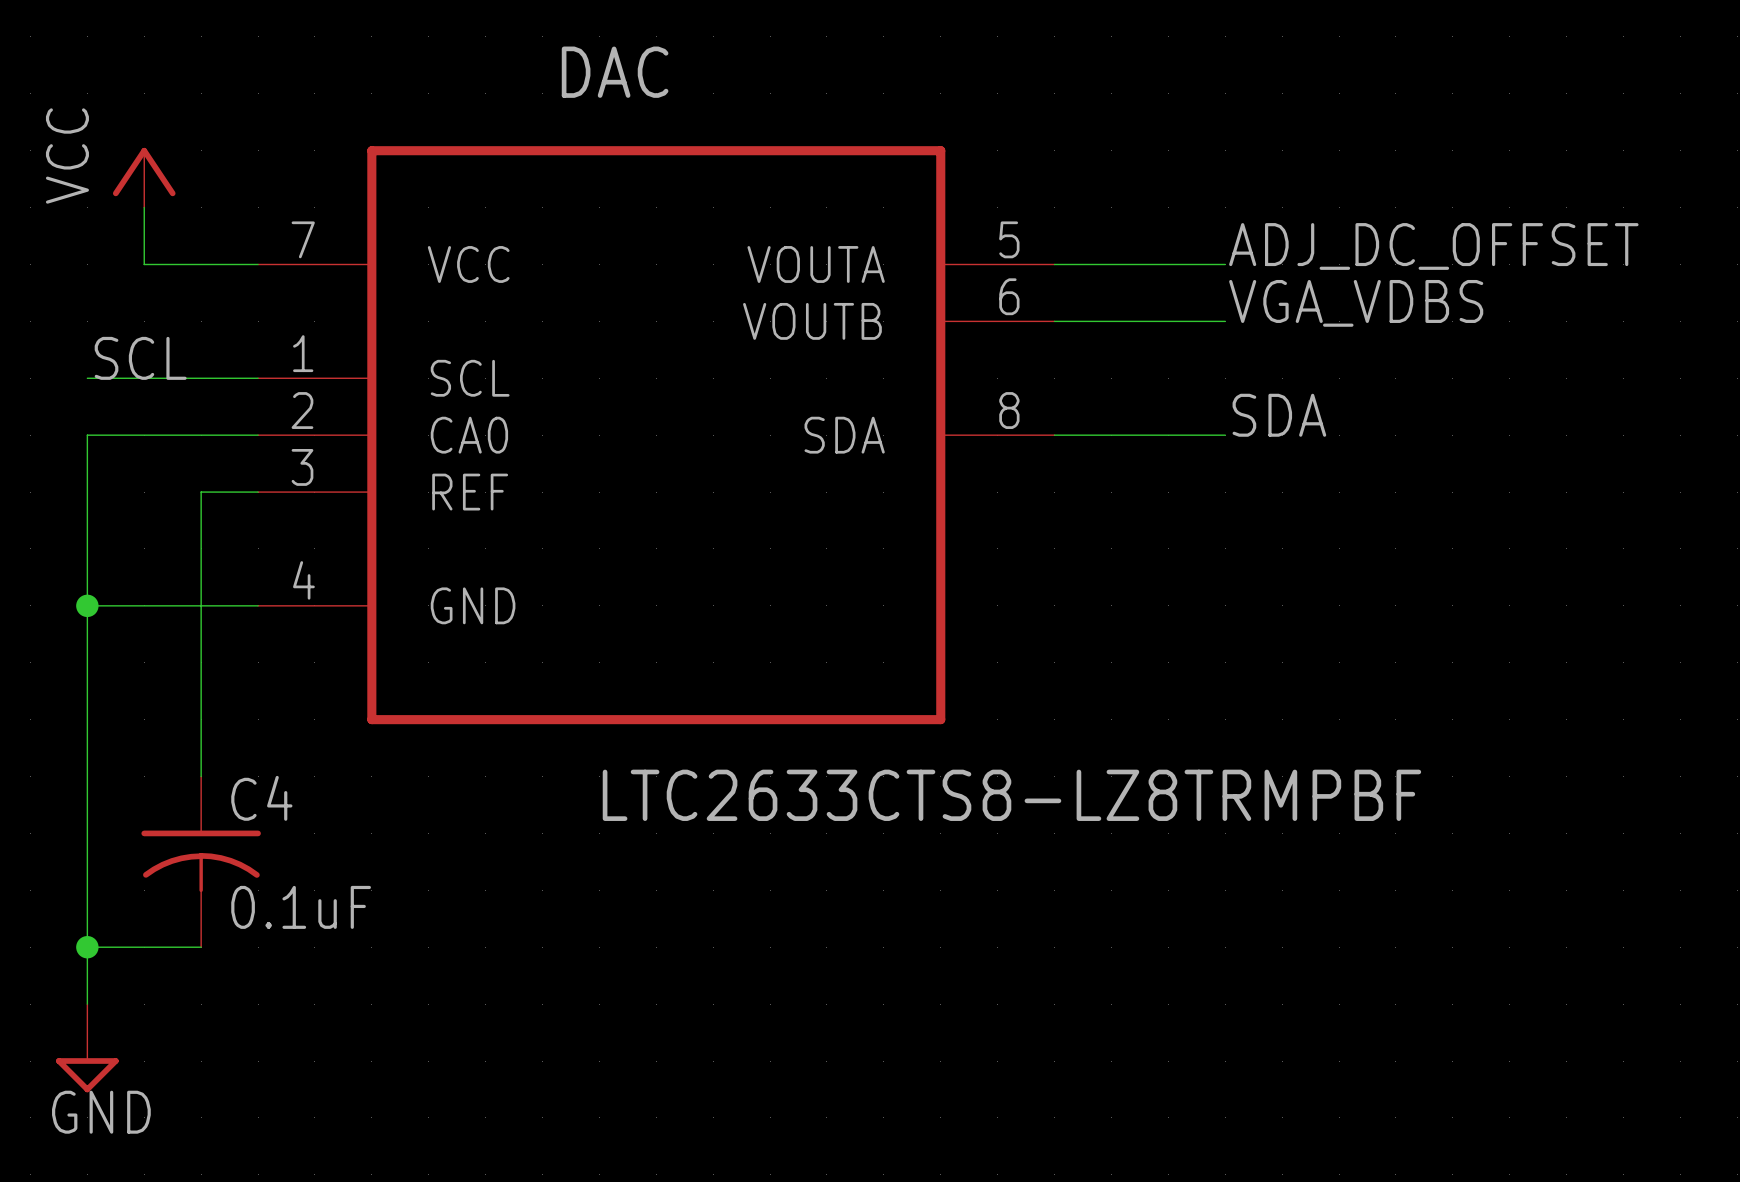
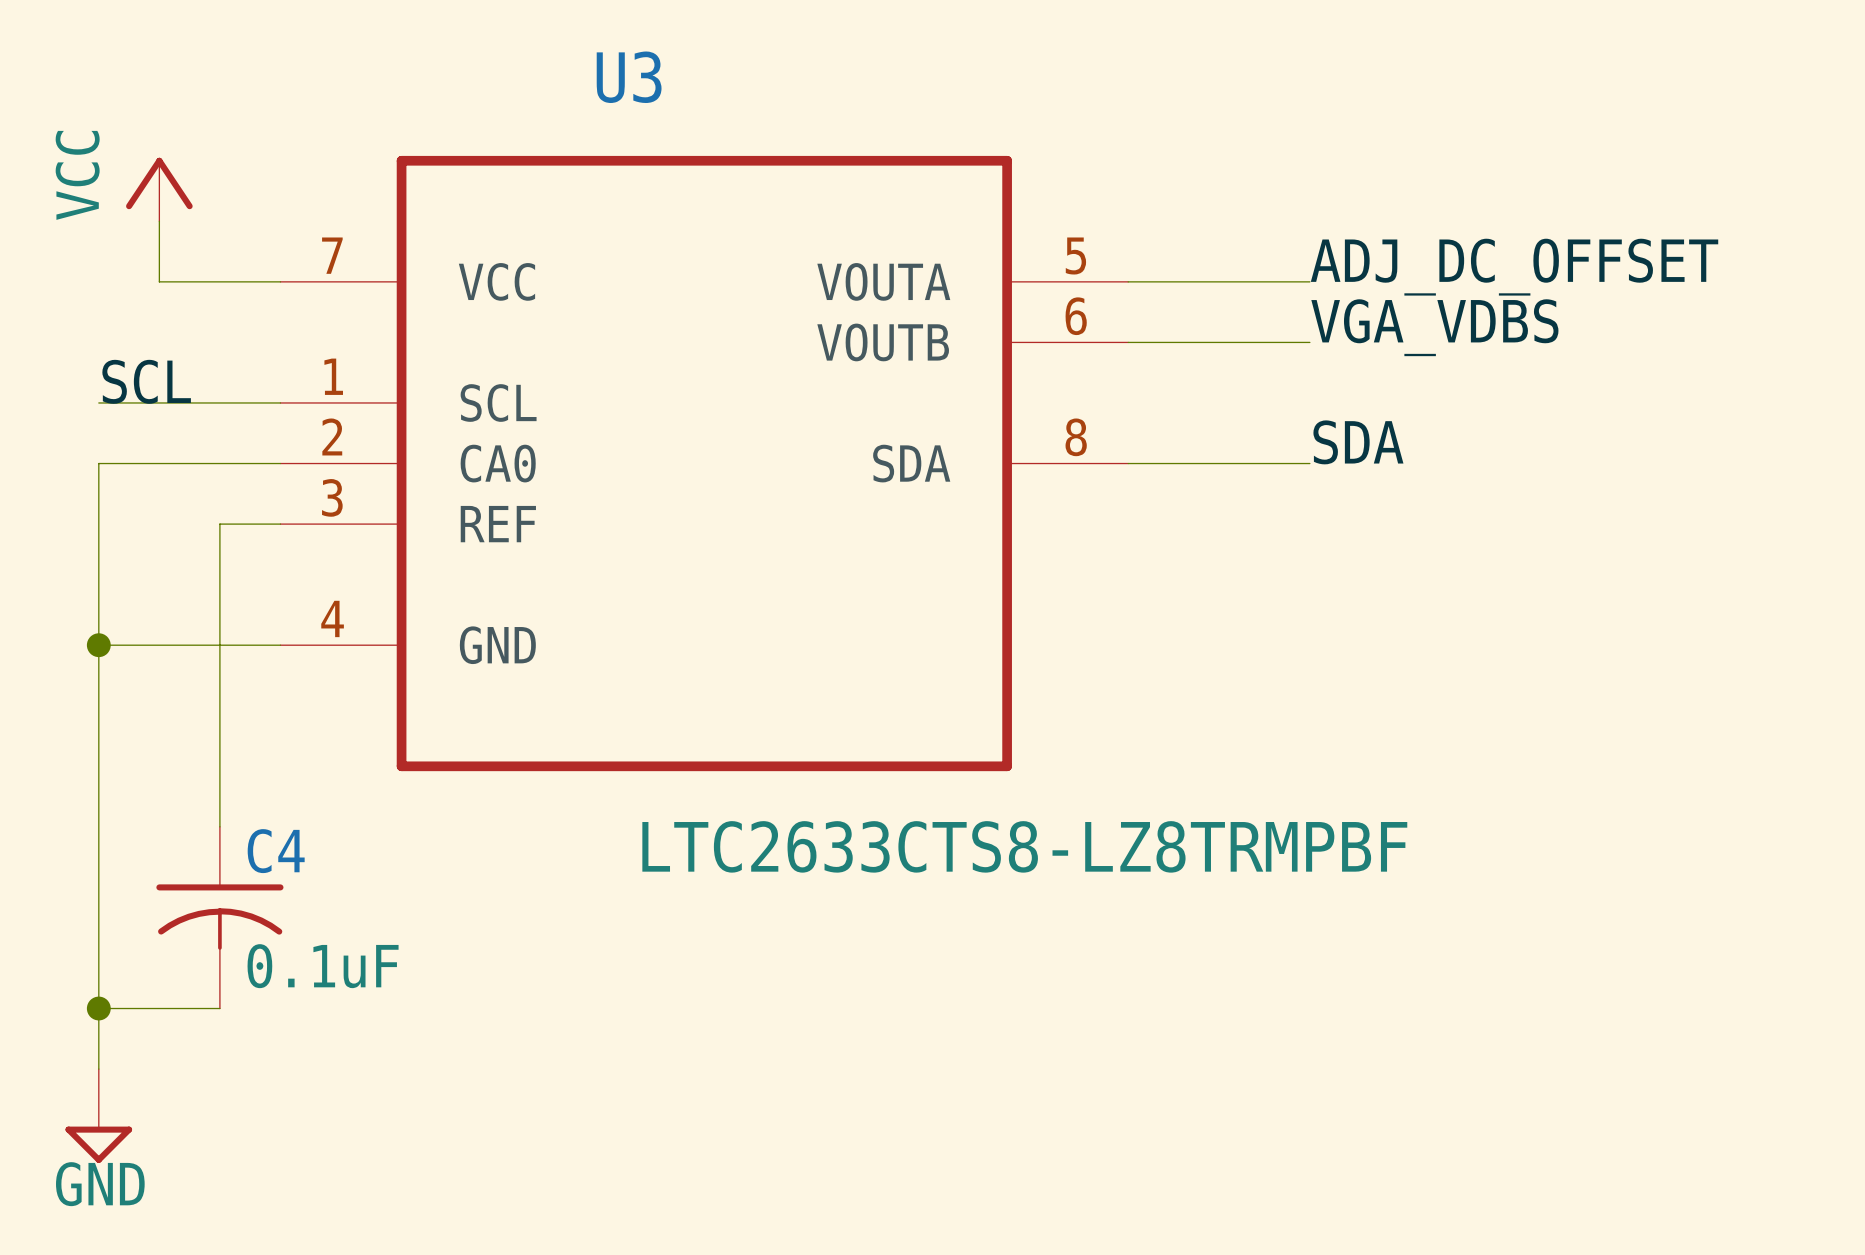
DAC name: DAC (615, 72) -> U3 (629, 77)

